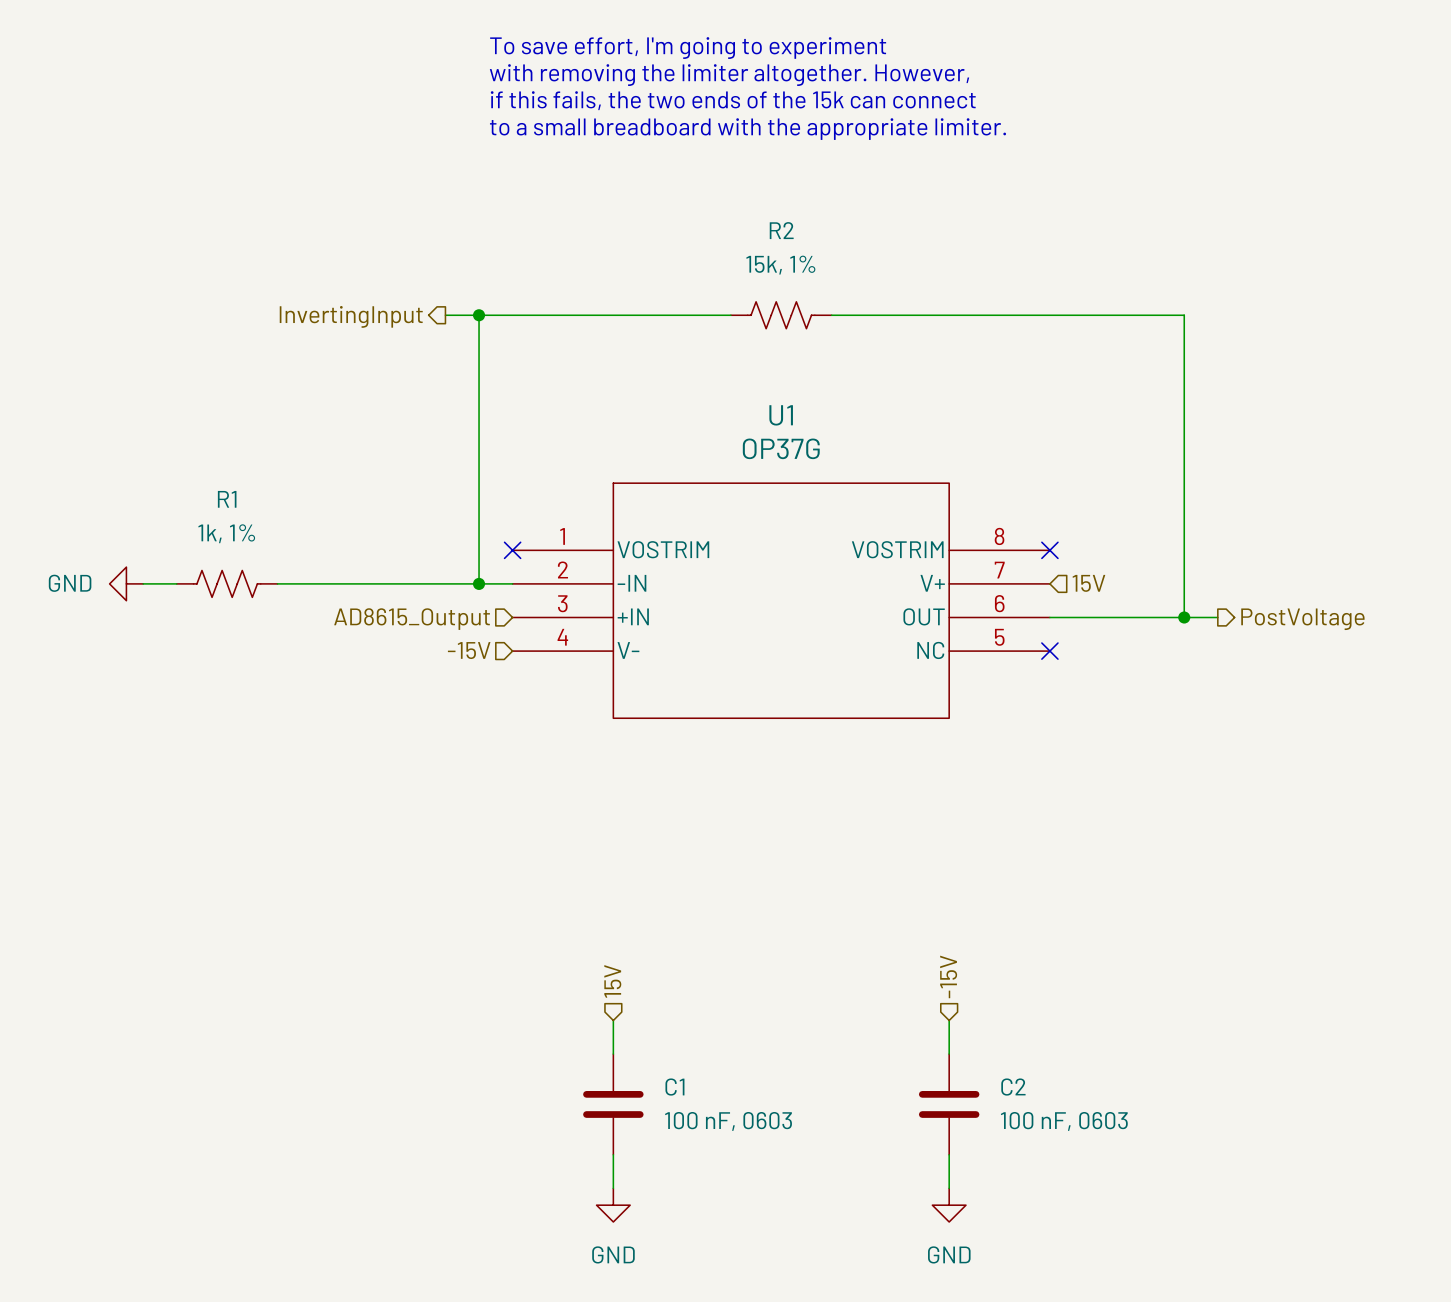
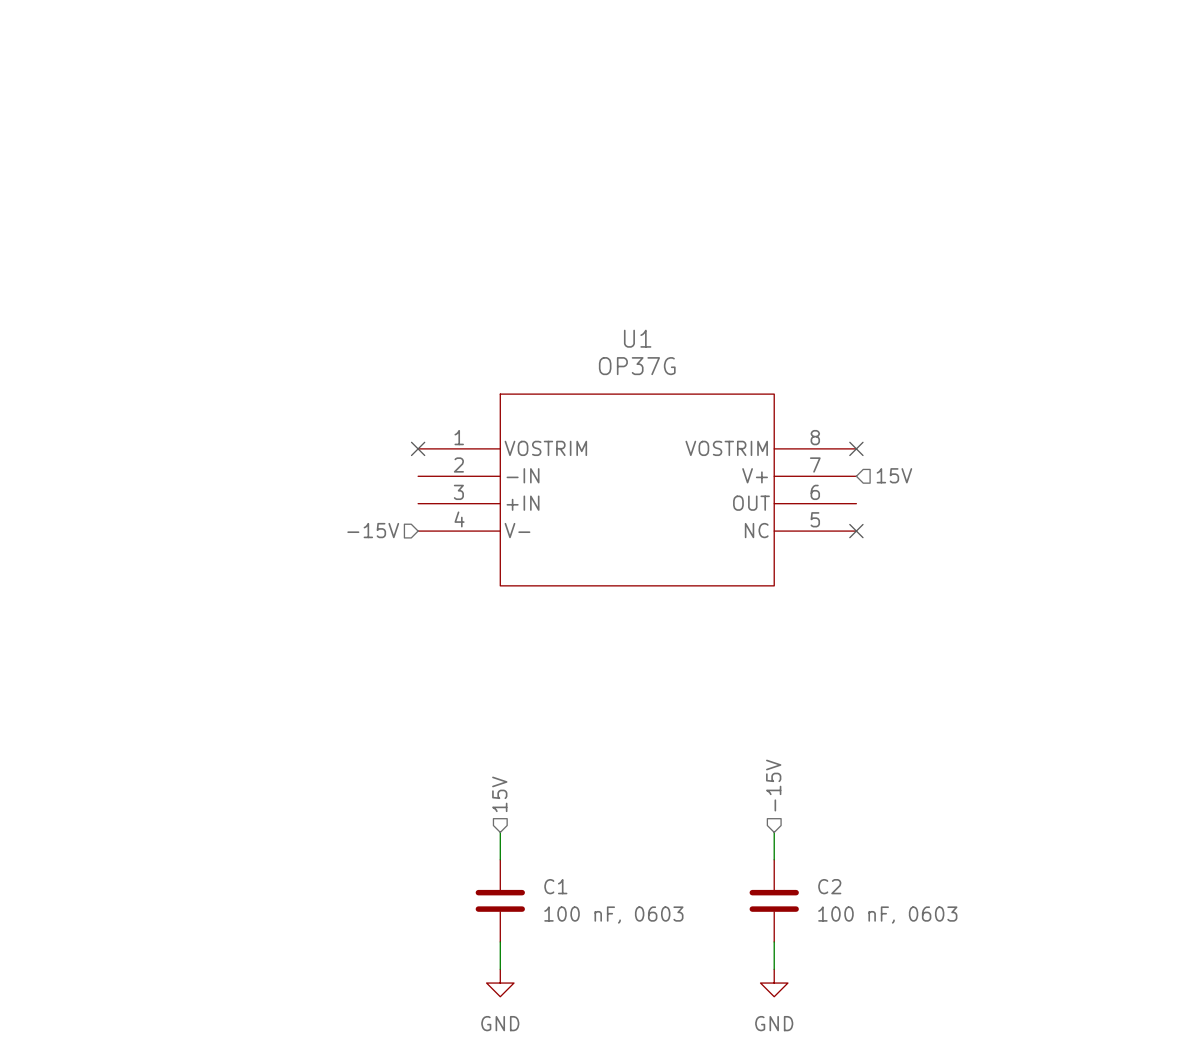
text: To save effort, I'm going to experiment (688, 48) -> none
text: with removing the limiter altogether. However, (729, 75) -> none
text: if this fails, the two ends of the 15k can connect (733, 100) -> none
text: to a small breadboard with the appropriate limiter. (748, 129) -> none
wire: (445, 315) (730, 315) -> none
wire: (479, 315) (479, 583) -> none
junction: (479, 315) -> none
R2: 15k, 1% (781, 315) -> none
wire: (831, 315) (1184, 315) (1184, 617) -> none
hierarchical label: InvertingInput (351, 316) -> none
power symbol: GND (126, 583) -> none
wire: (143, 583) (176, 583) -> none
R1: 1k, 1% (227, 583) -> none
wire: (277, 583) (512, 583) -> none
junction: (479, 583) -> none
wire: (1049, 617) (1217, 617) -> none
junction: (1184, 617) -> none
hierarchical label: AD8615_Output (412, 619) -> none
hierarchical label: PostVoltage (1302, 619) -> none

